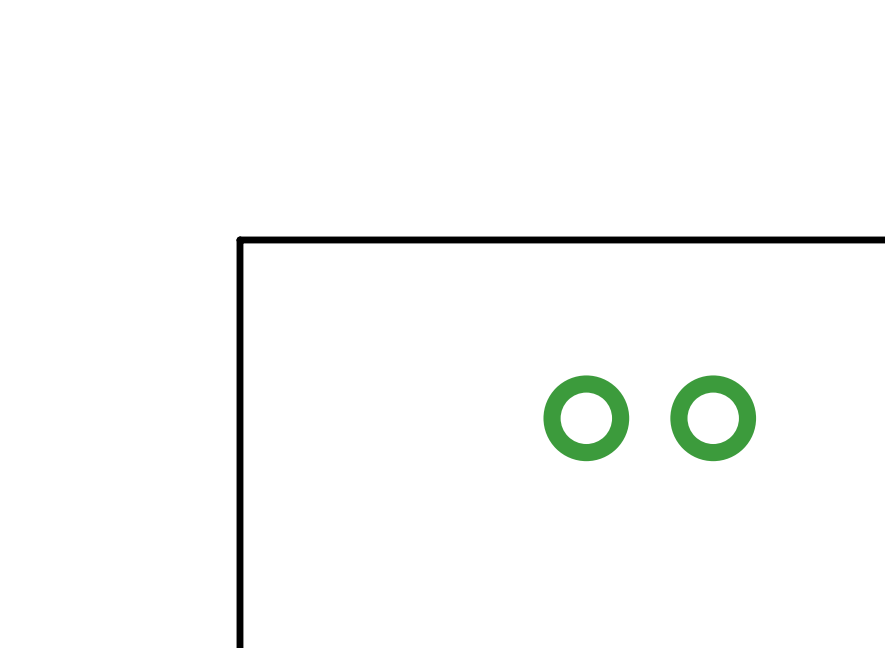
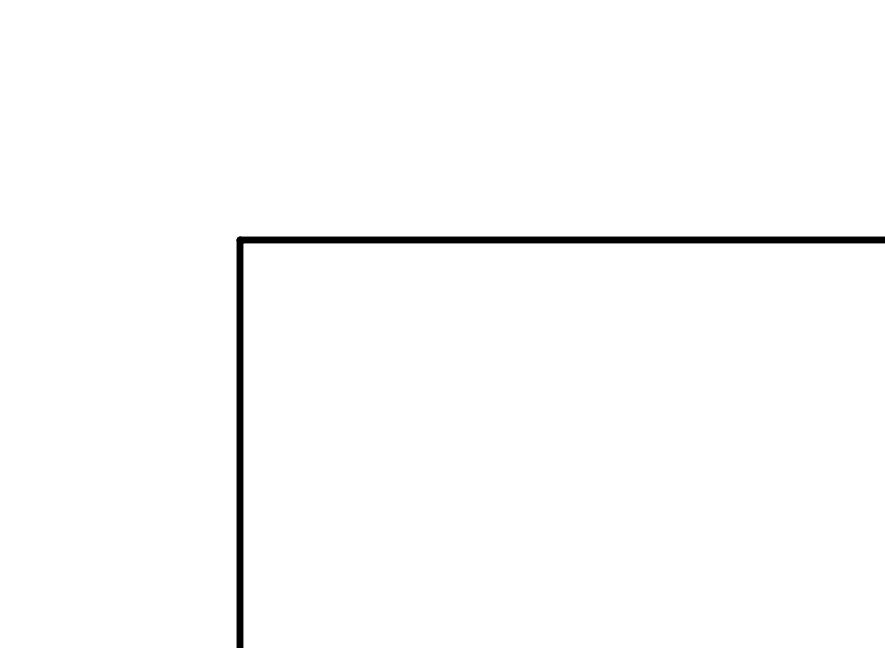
part: (586, 418) -> none
part: (713, 418) -> none

